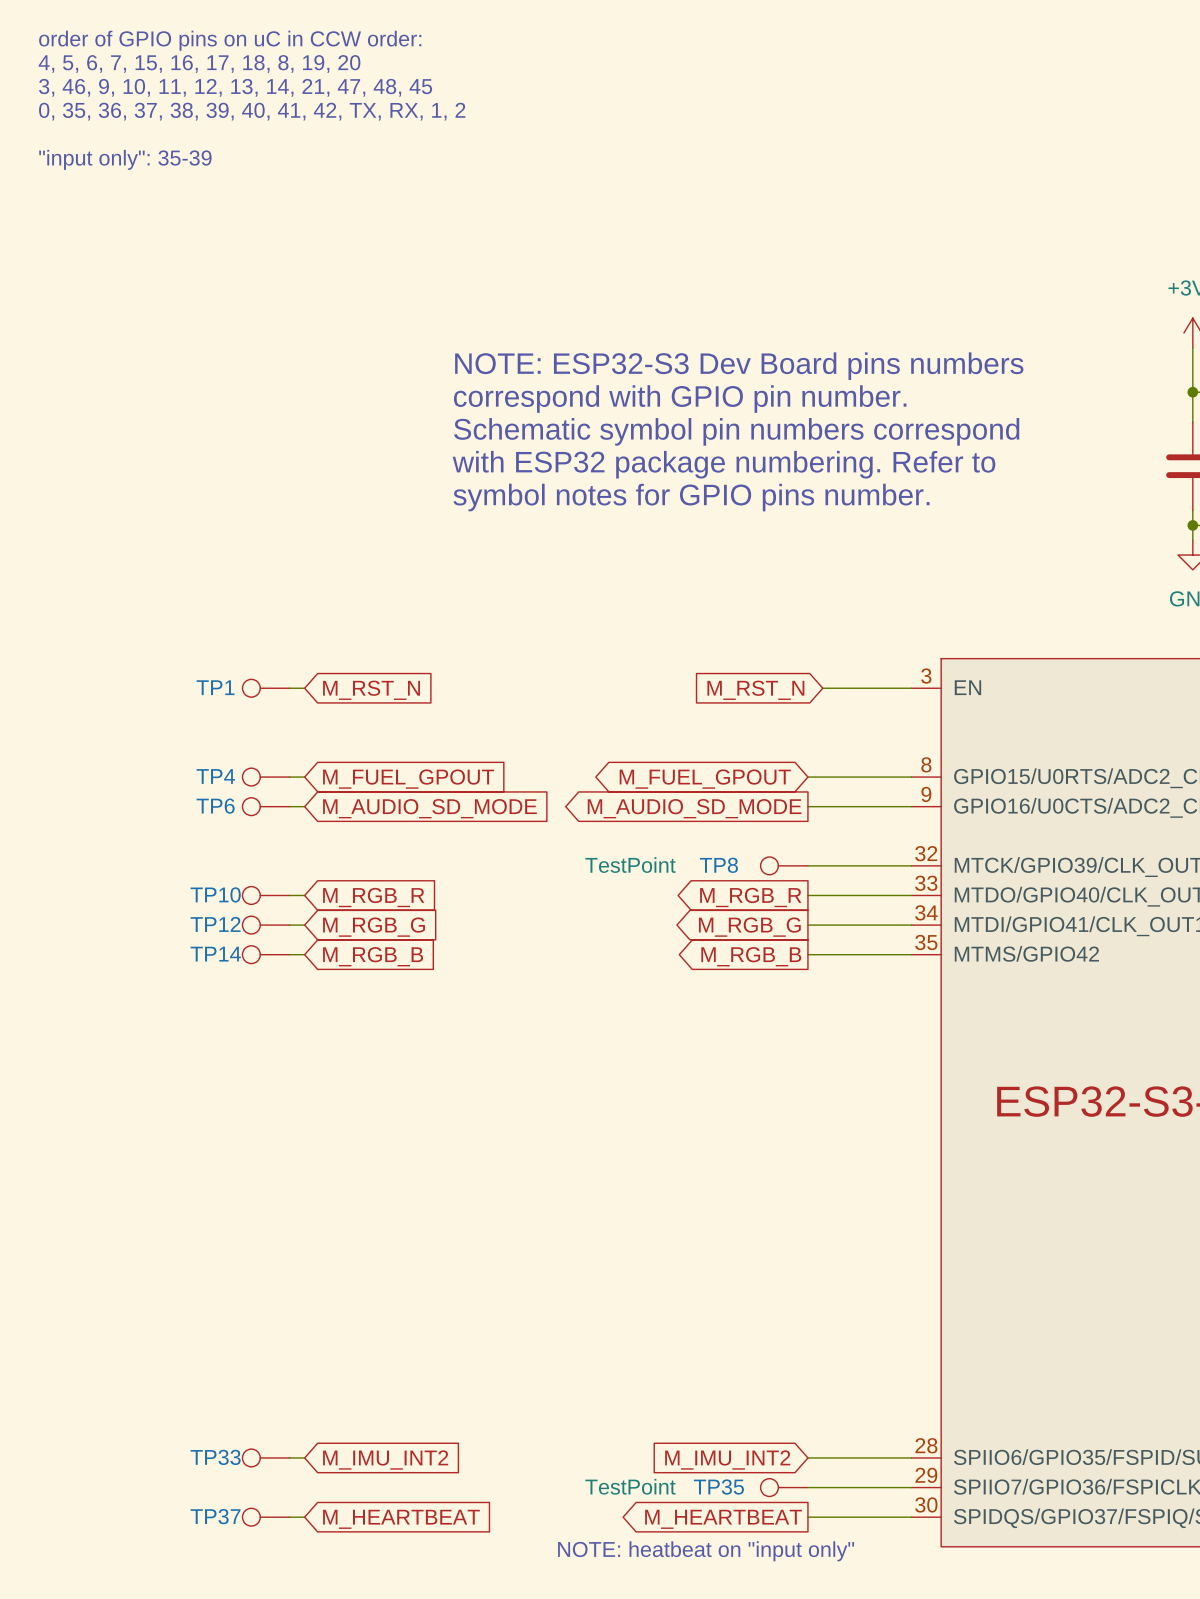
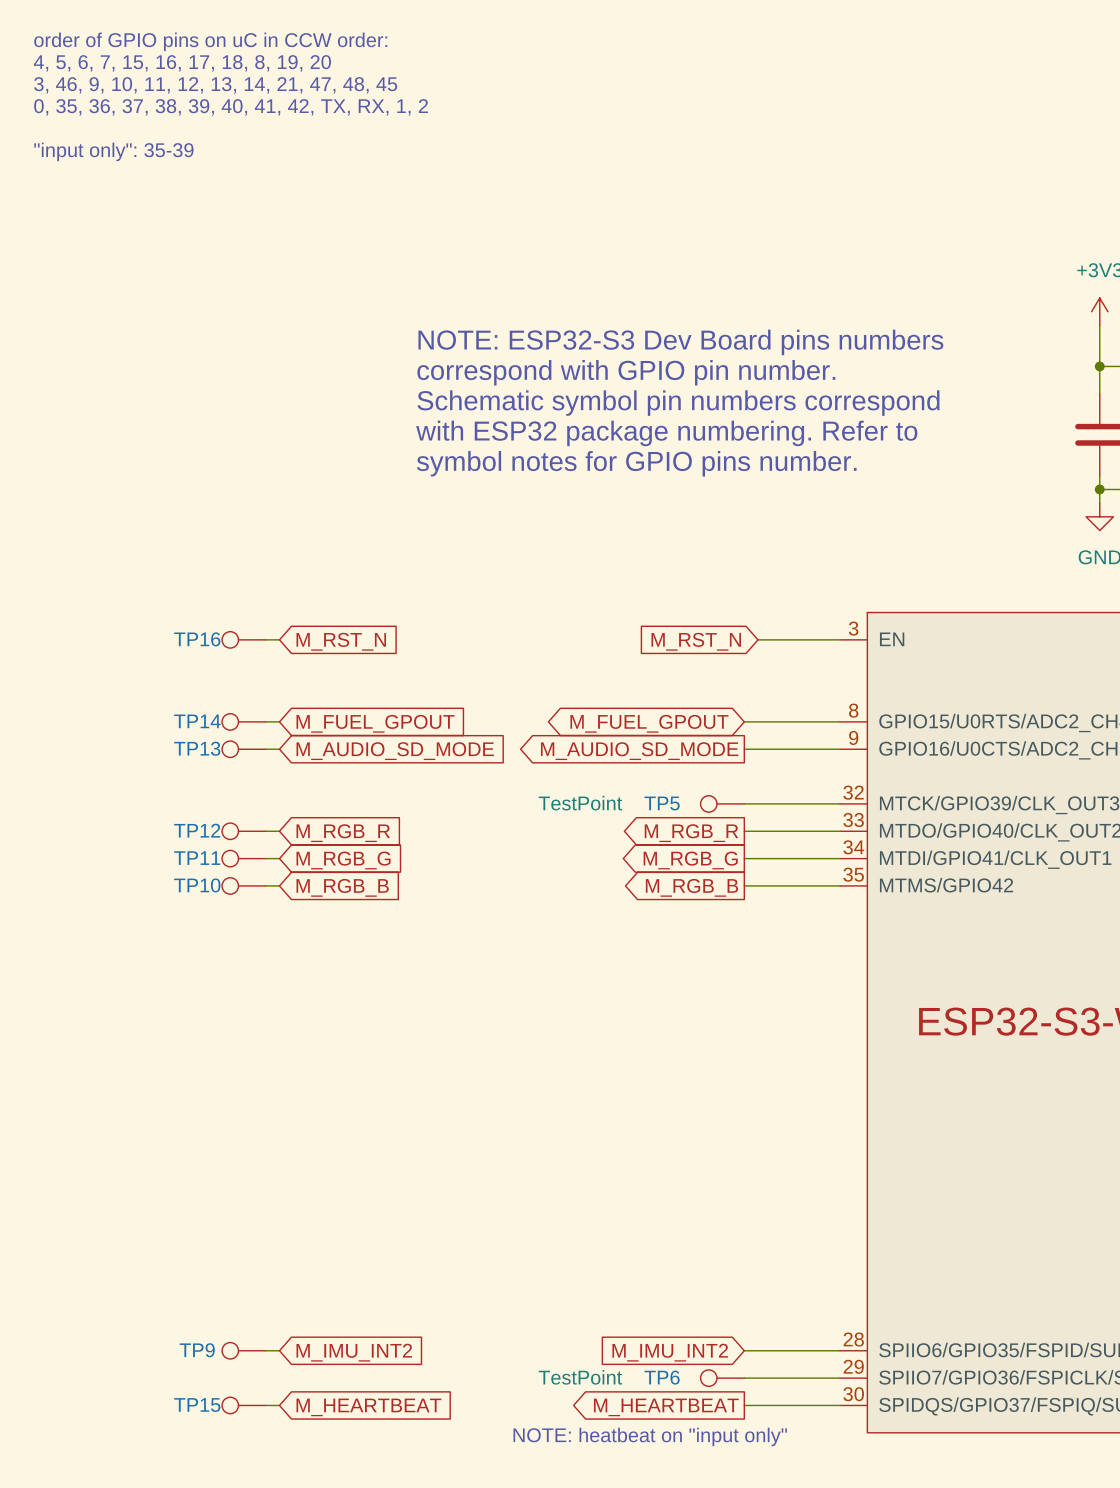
TP1 name: TP1 (215, 687) -> TP16 (197, 639)
TP4 name: TP4 (215, 776) -> TP14 (197, 721)
TP6 name: TP6 (215, 806) -> TP13 (197, 748)
TP8 name: TP8 (718, 865) -> TP5 (662, 803)
TP10 name: TP10 (215, 894) -> TP12 (197, 830)
TP12 name: TP12 (215, 924) -> TP11 (197, 858)
TP14 name: TP14 (215, 954) -> TP10 (197, 885)
TP33 name: TP33 (215, 1457) -> TP9 (197, 1350)
TP35 name: TP35 (718, 1487) -> TP6 (662, 1377)
TP37 name: TP37 (215, 1516) -> TP15 (197, 1405)

